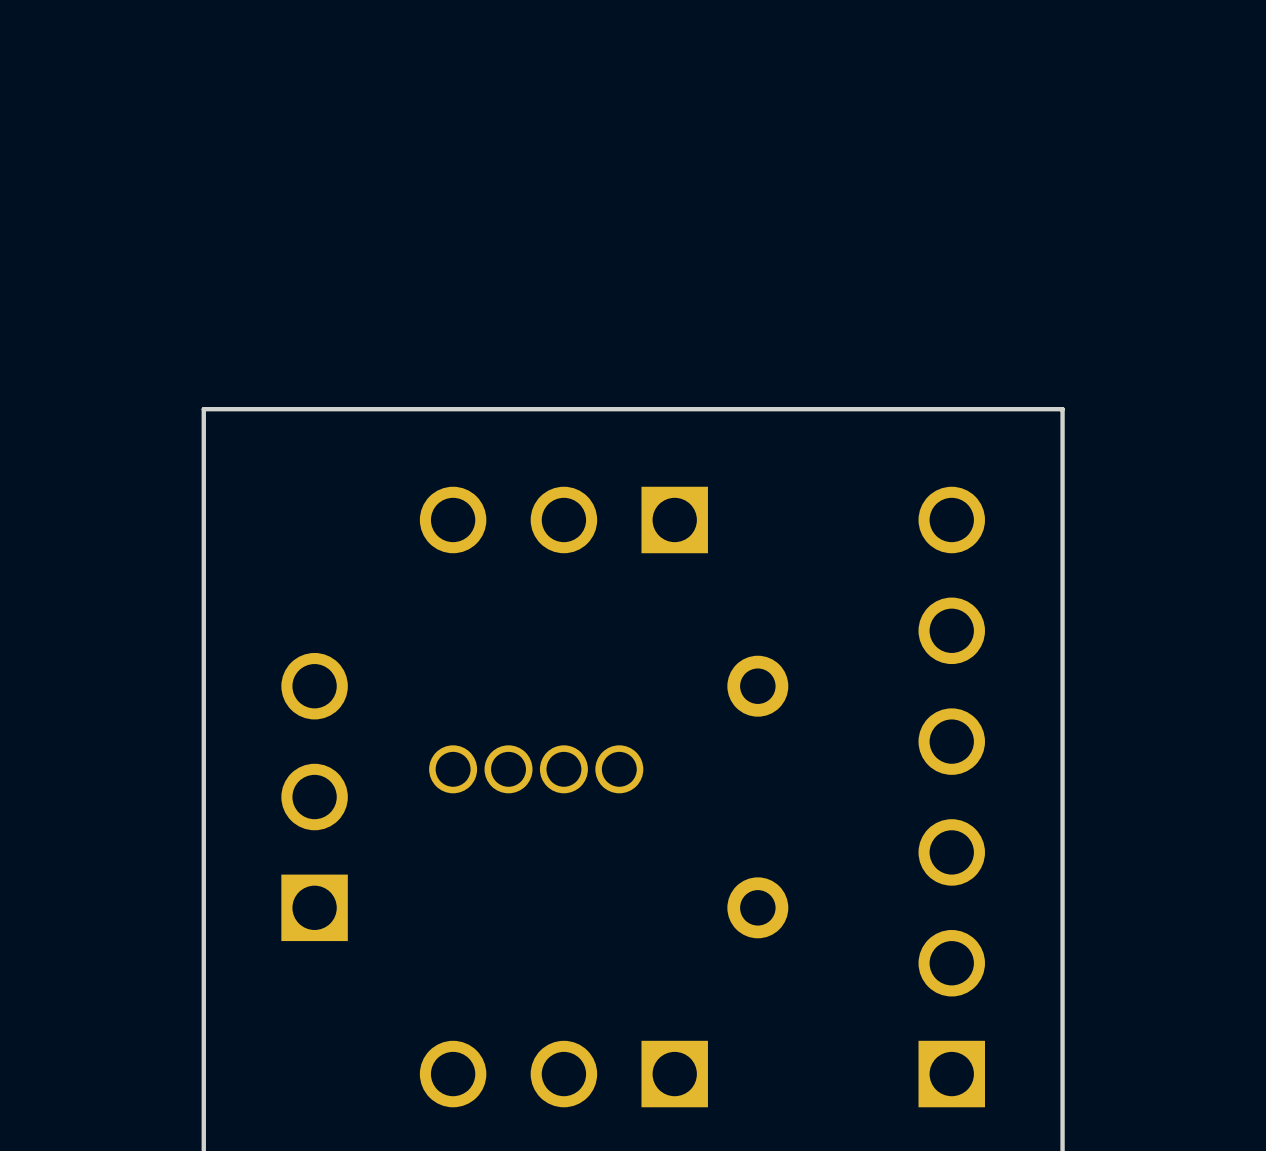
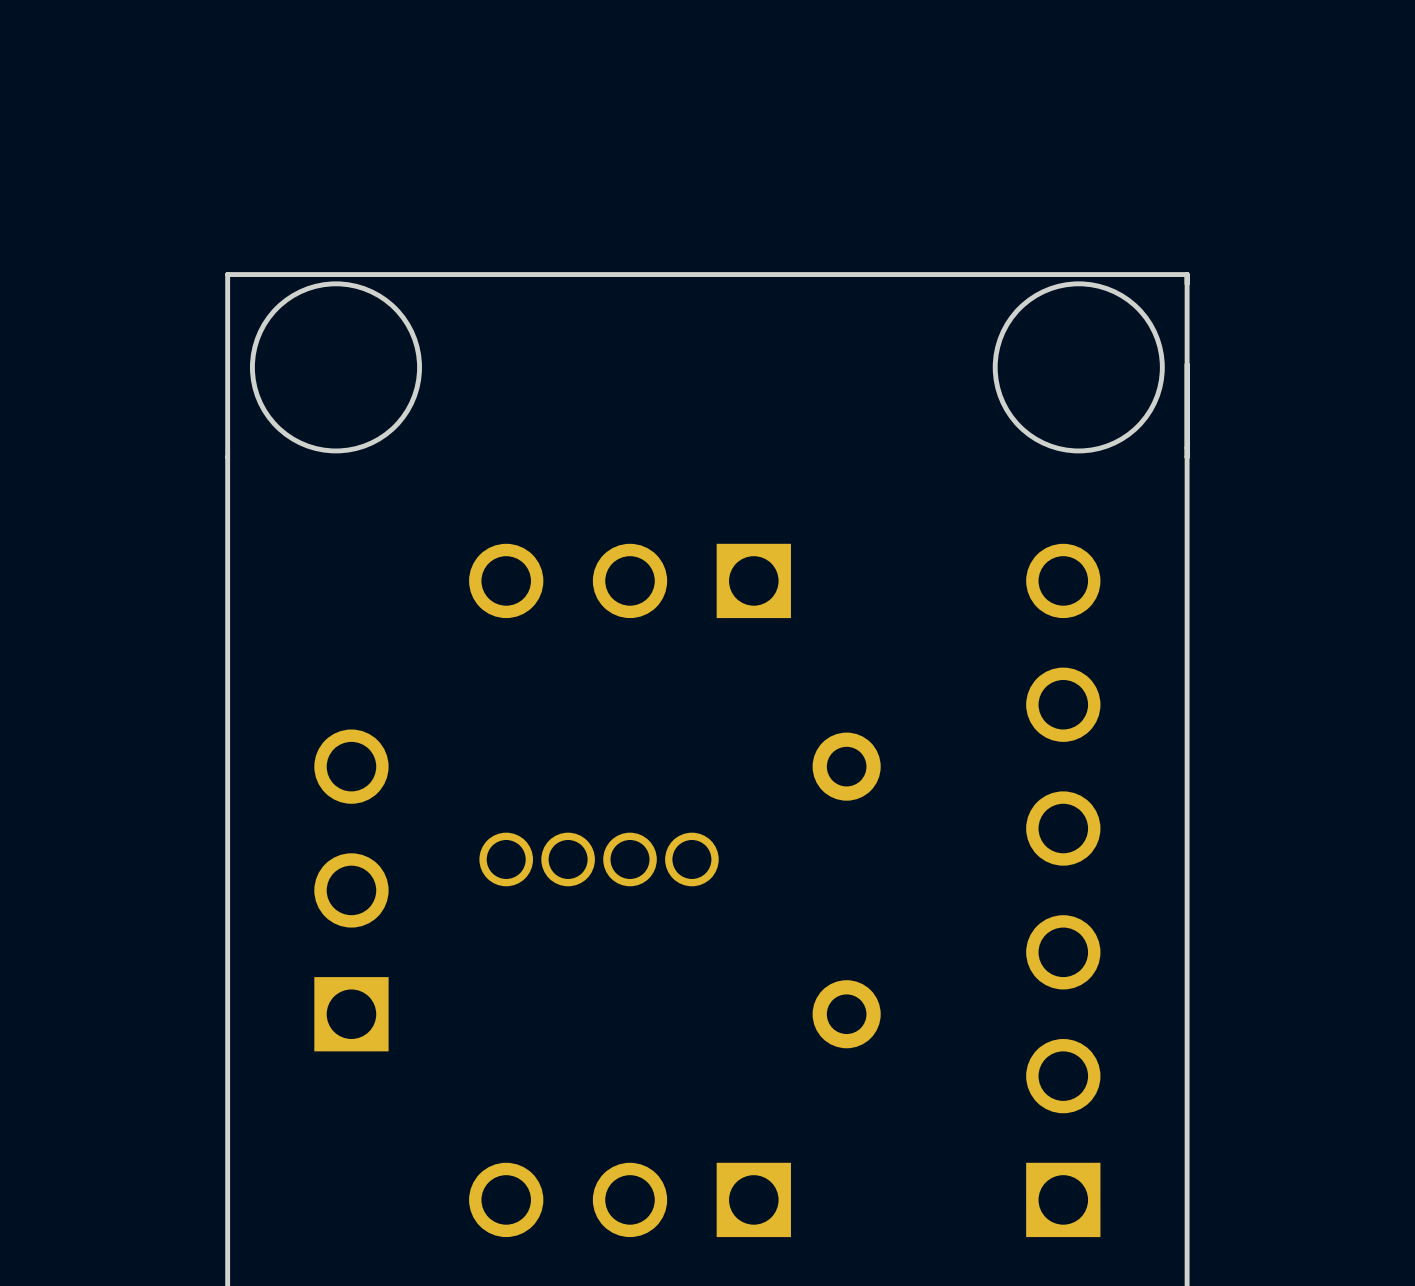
round board edge: none -> [249, 281, 422, 454]
round board edge: none -> [992, 281, 1165, 454]
board edge: (1062, 409) (203, 409) -> (1187, 457) (1187, 274) (227, 274) (227, 457)

